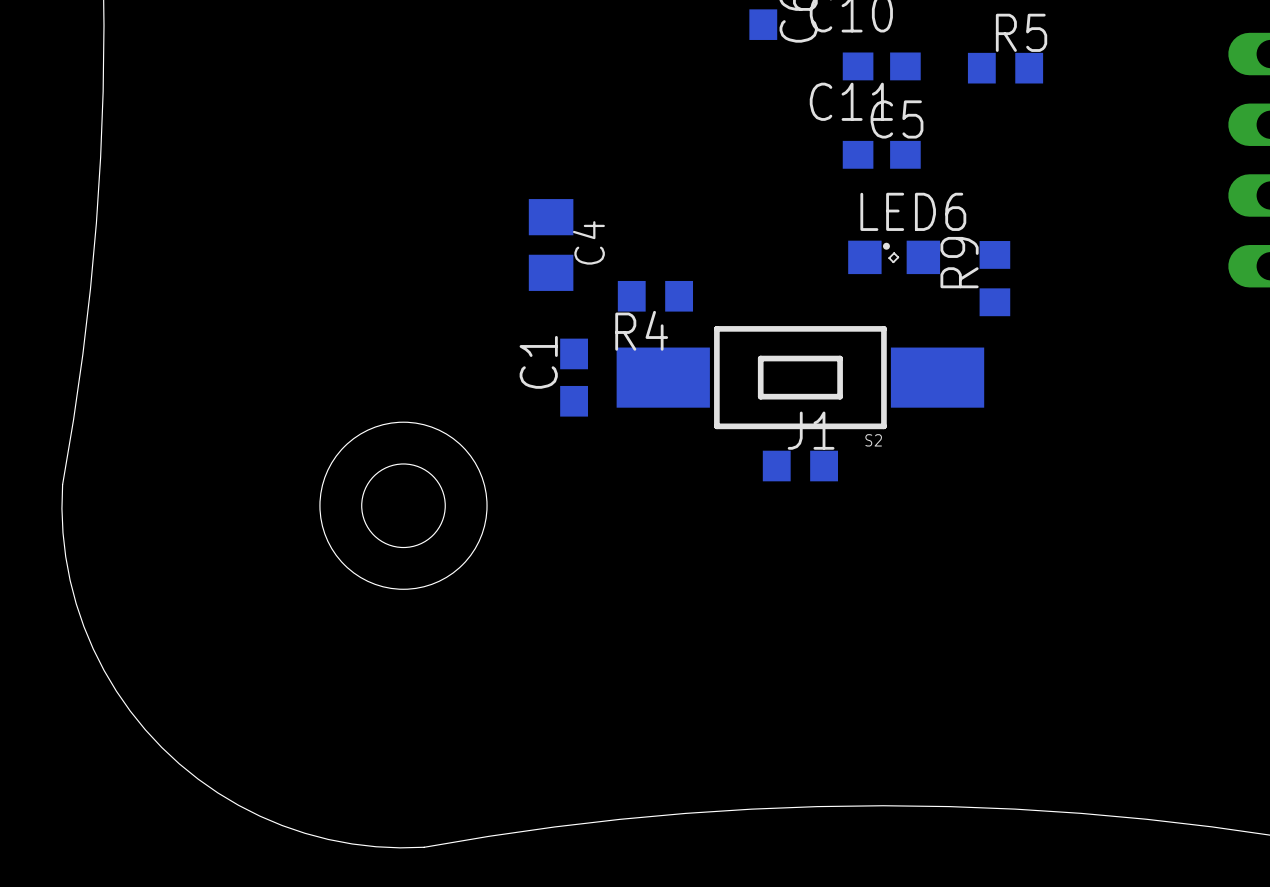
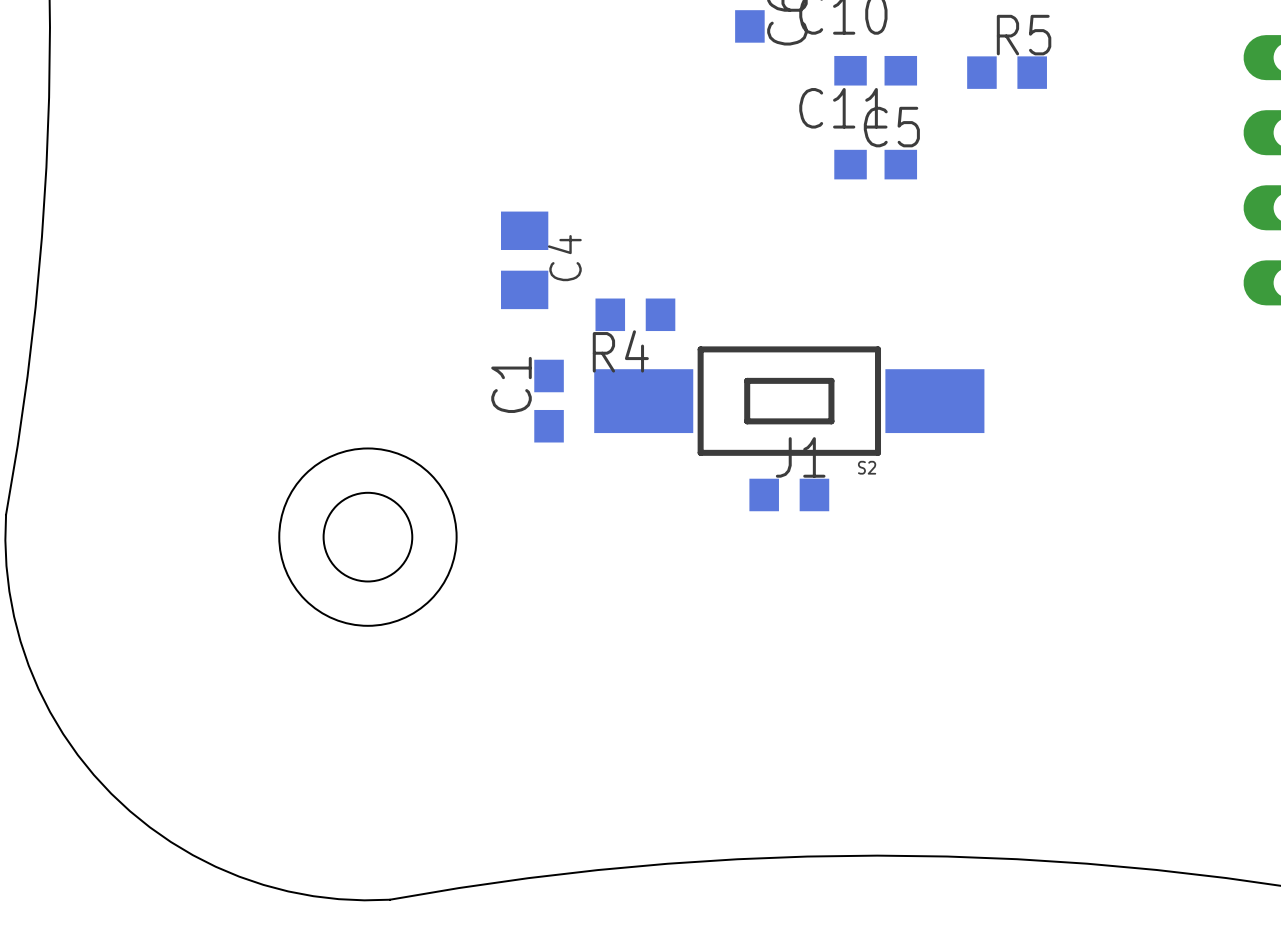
LED6: (894, 257) -> none
R9: (994, 278) -> none

